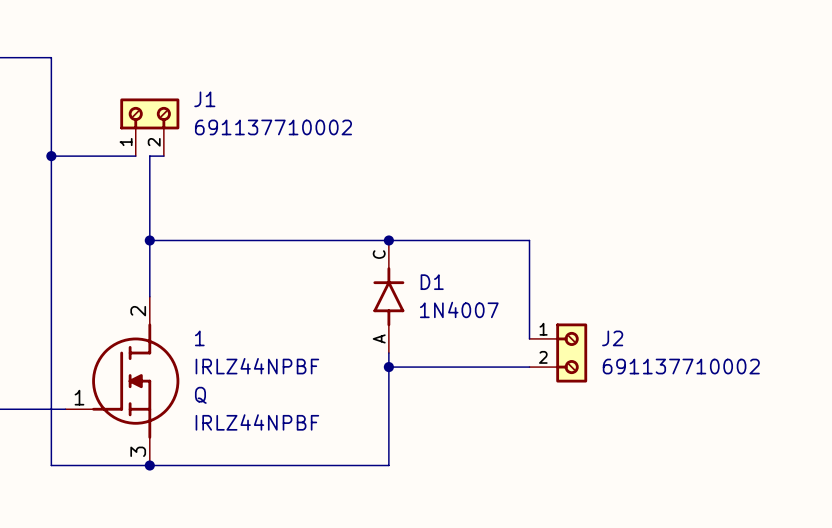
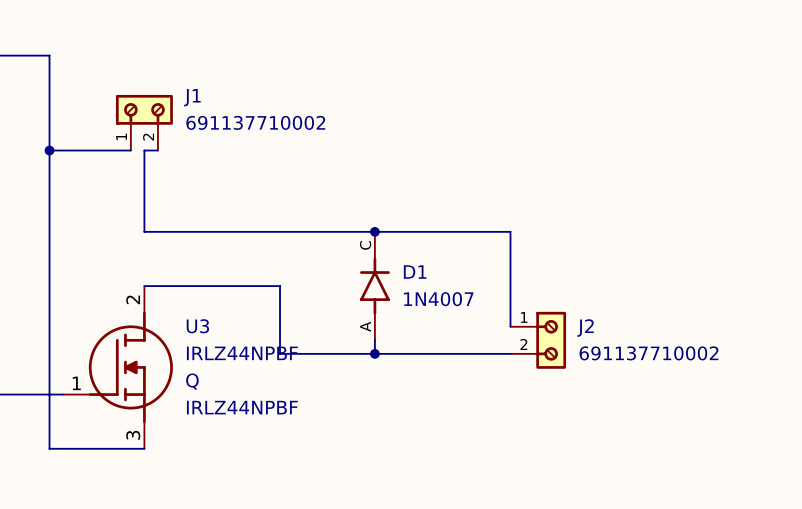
wire: (149, 240) (149, 296) -> none
junction: (149, 240) -> none
1 name: 1 (199, 338) -> U3 (197, 326)
wire: (388, 367) (388, 465) (149, 465) -> (374, 353) (280, 353) (280, 286) (144, 286)
junction: (149, 465) -> none

